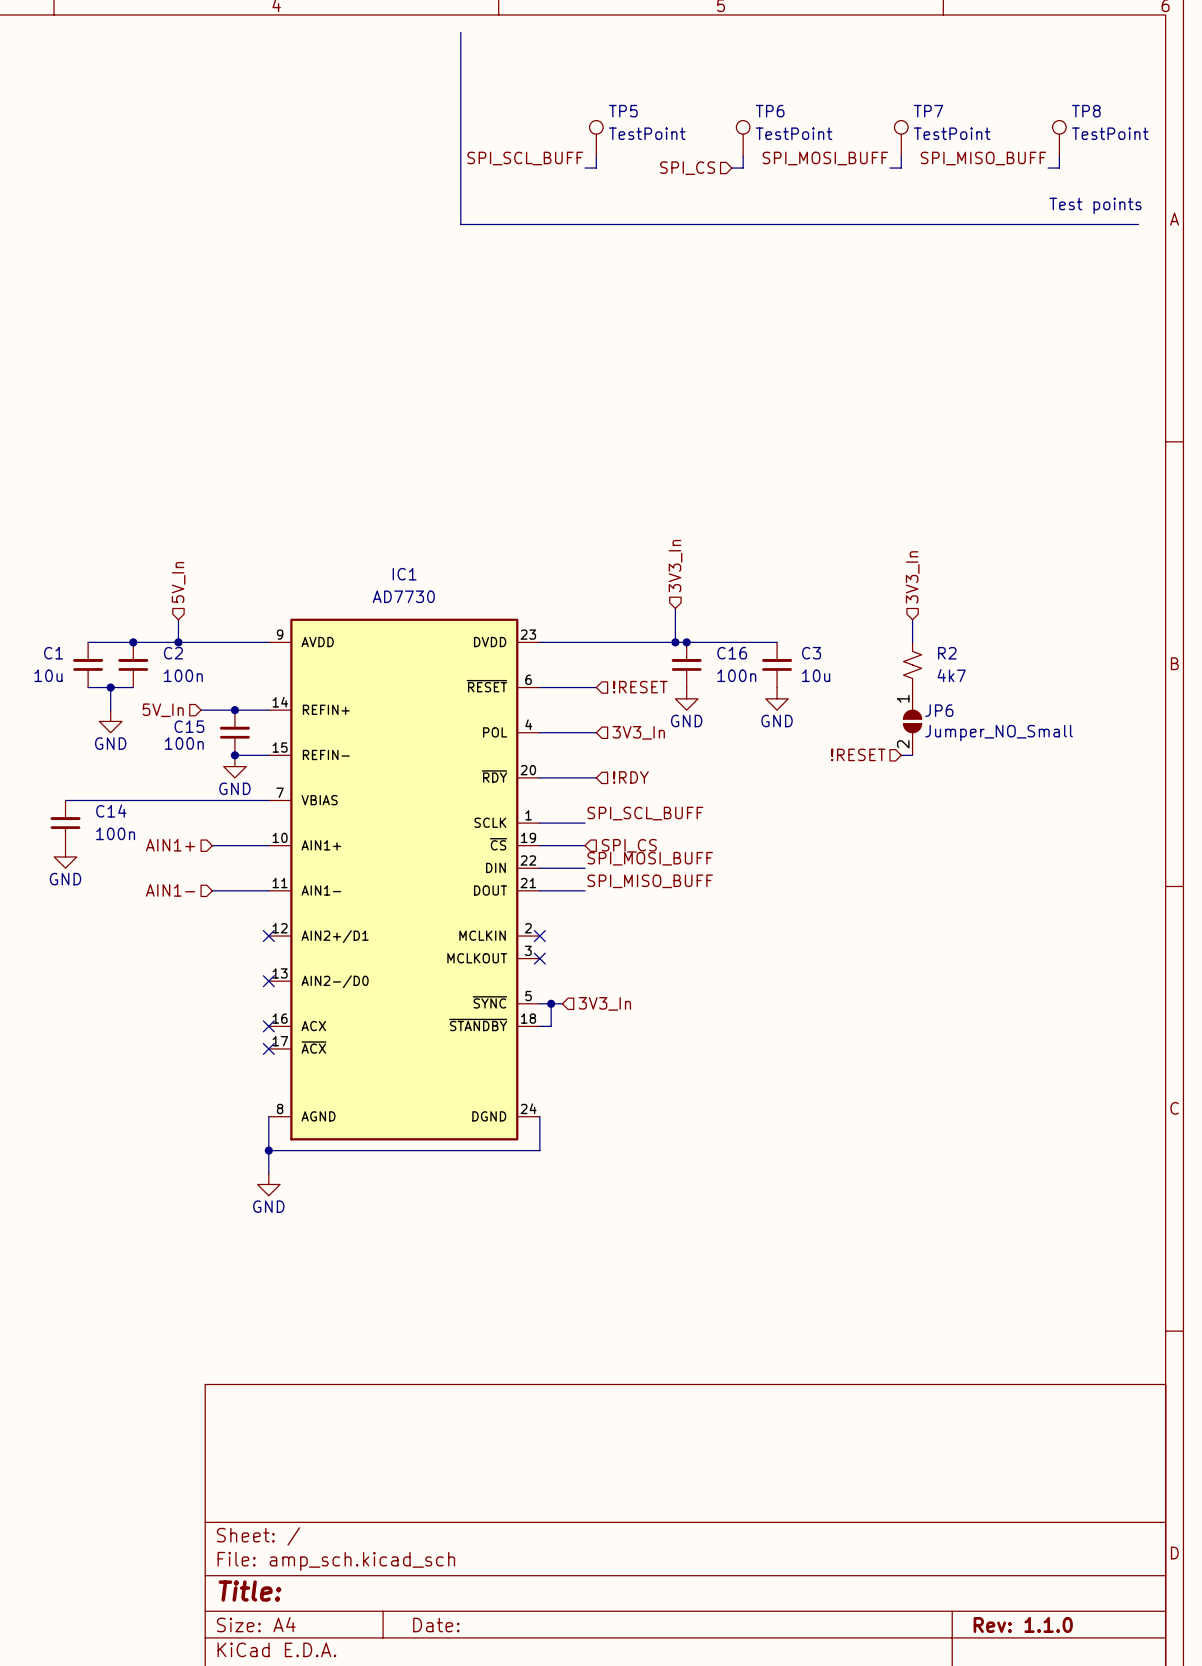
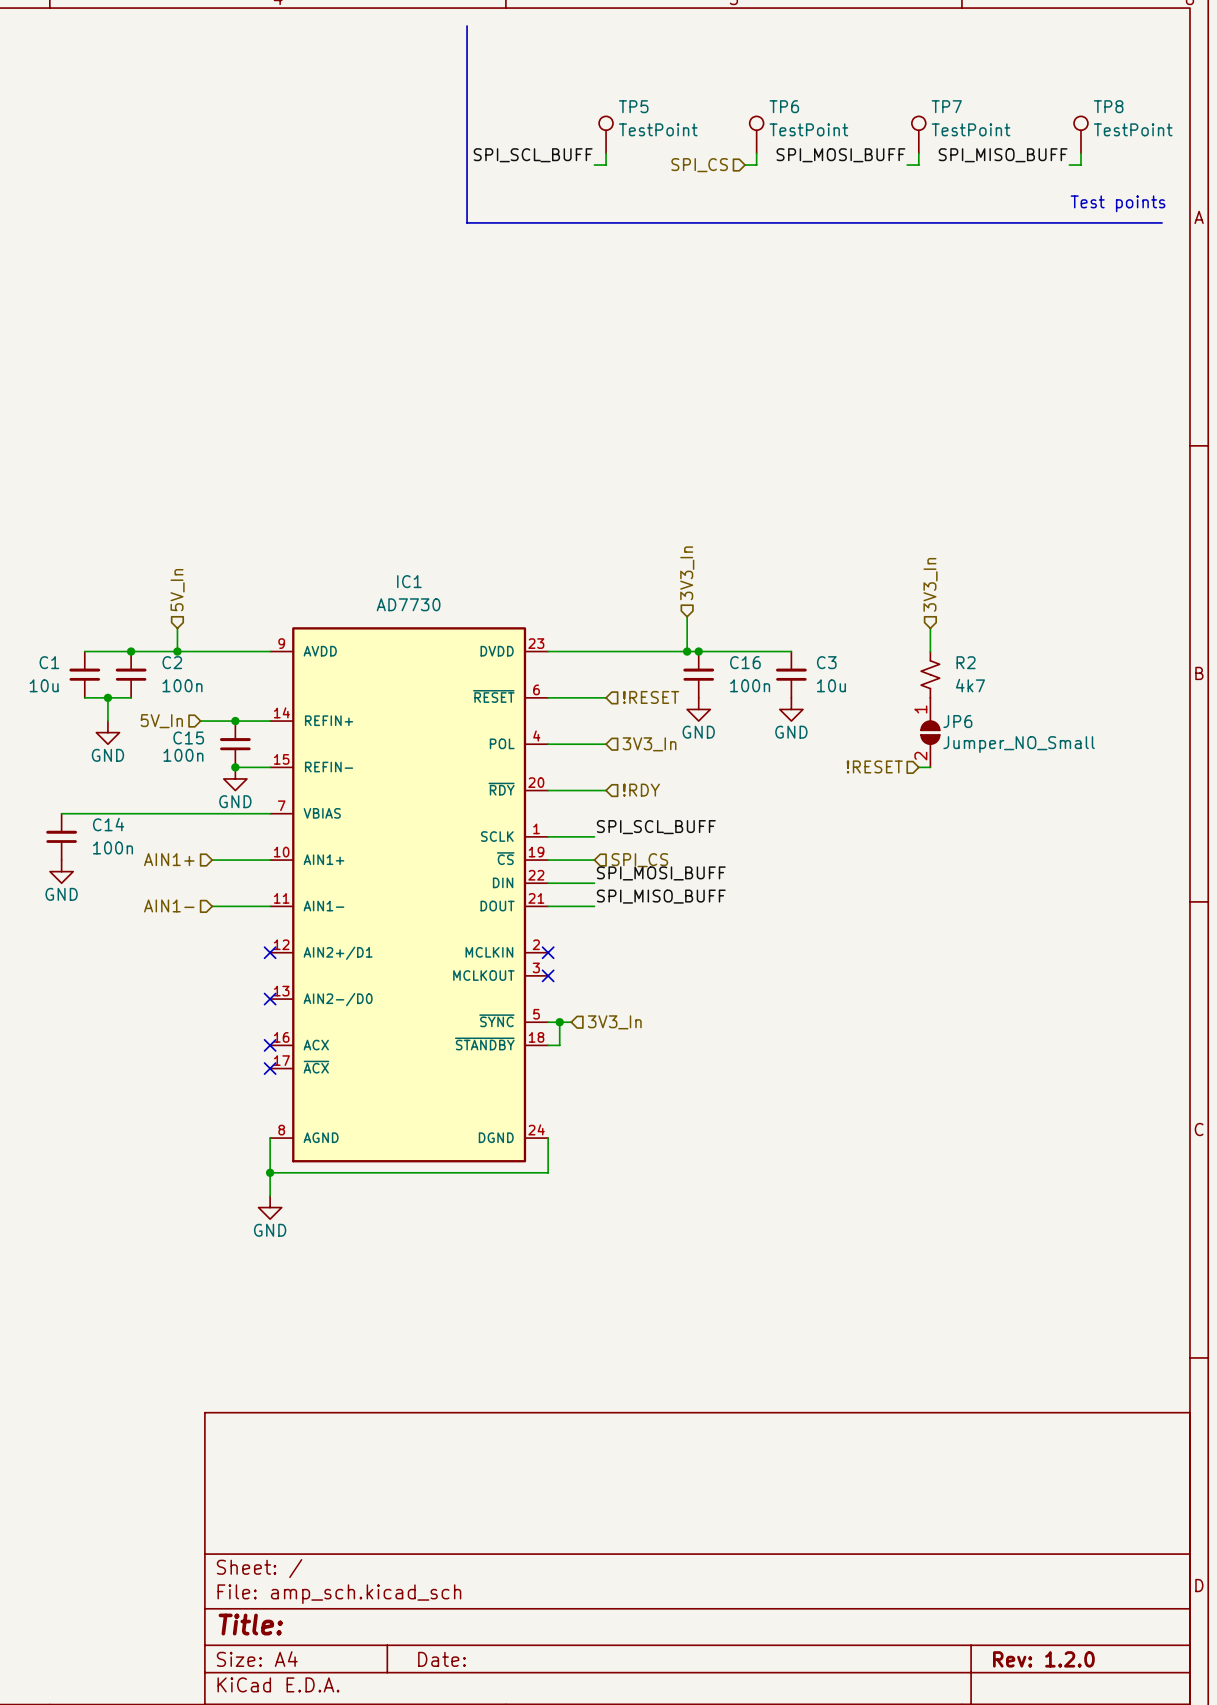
title block: Rev: 1.1.0 (1023, 1624) -> Rev: 1.2.0 (1043, 1659)

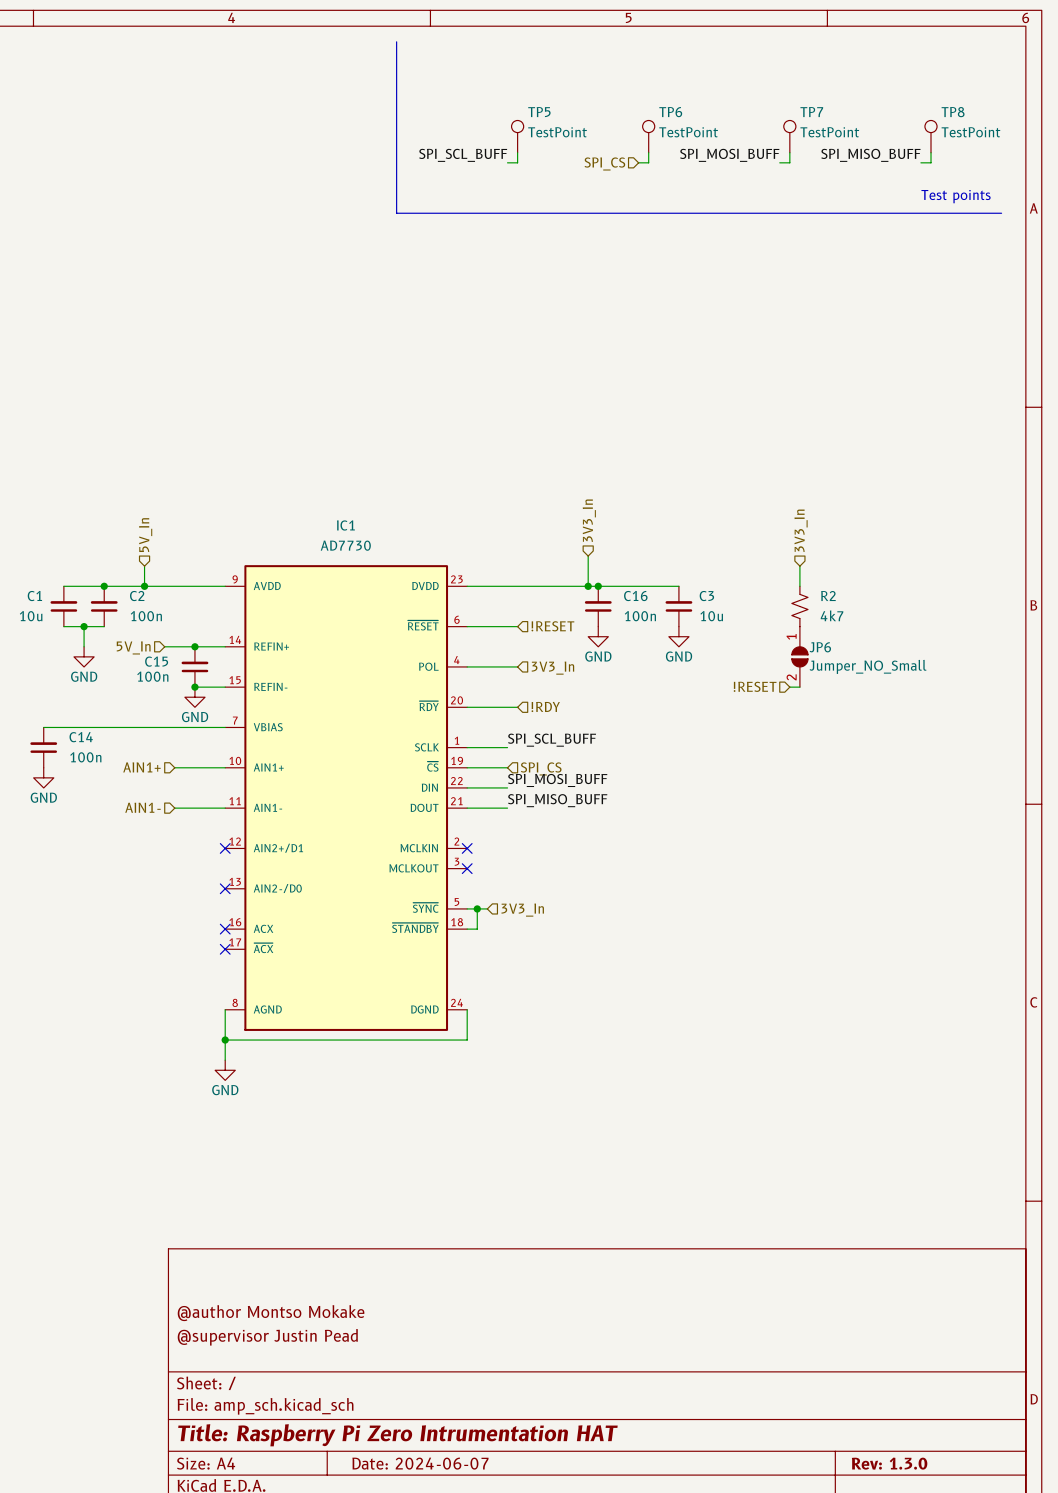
title block: none -> @author Montso Mokake (271, 1313)
title block: none -> @supervisor Justin Pead (267, 1337)
title block: Title: (250, 1624) -> Title: Raspberry Pi Zero Intrumentation HAT (397, 1435)
title block: Date: (441, 1659) -> Date: 2024-06-07 (420, 1463)
title block: Rev: 1.2.0 (1043, 1659) -> Rev: 1.3.0 (889, 1463)

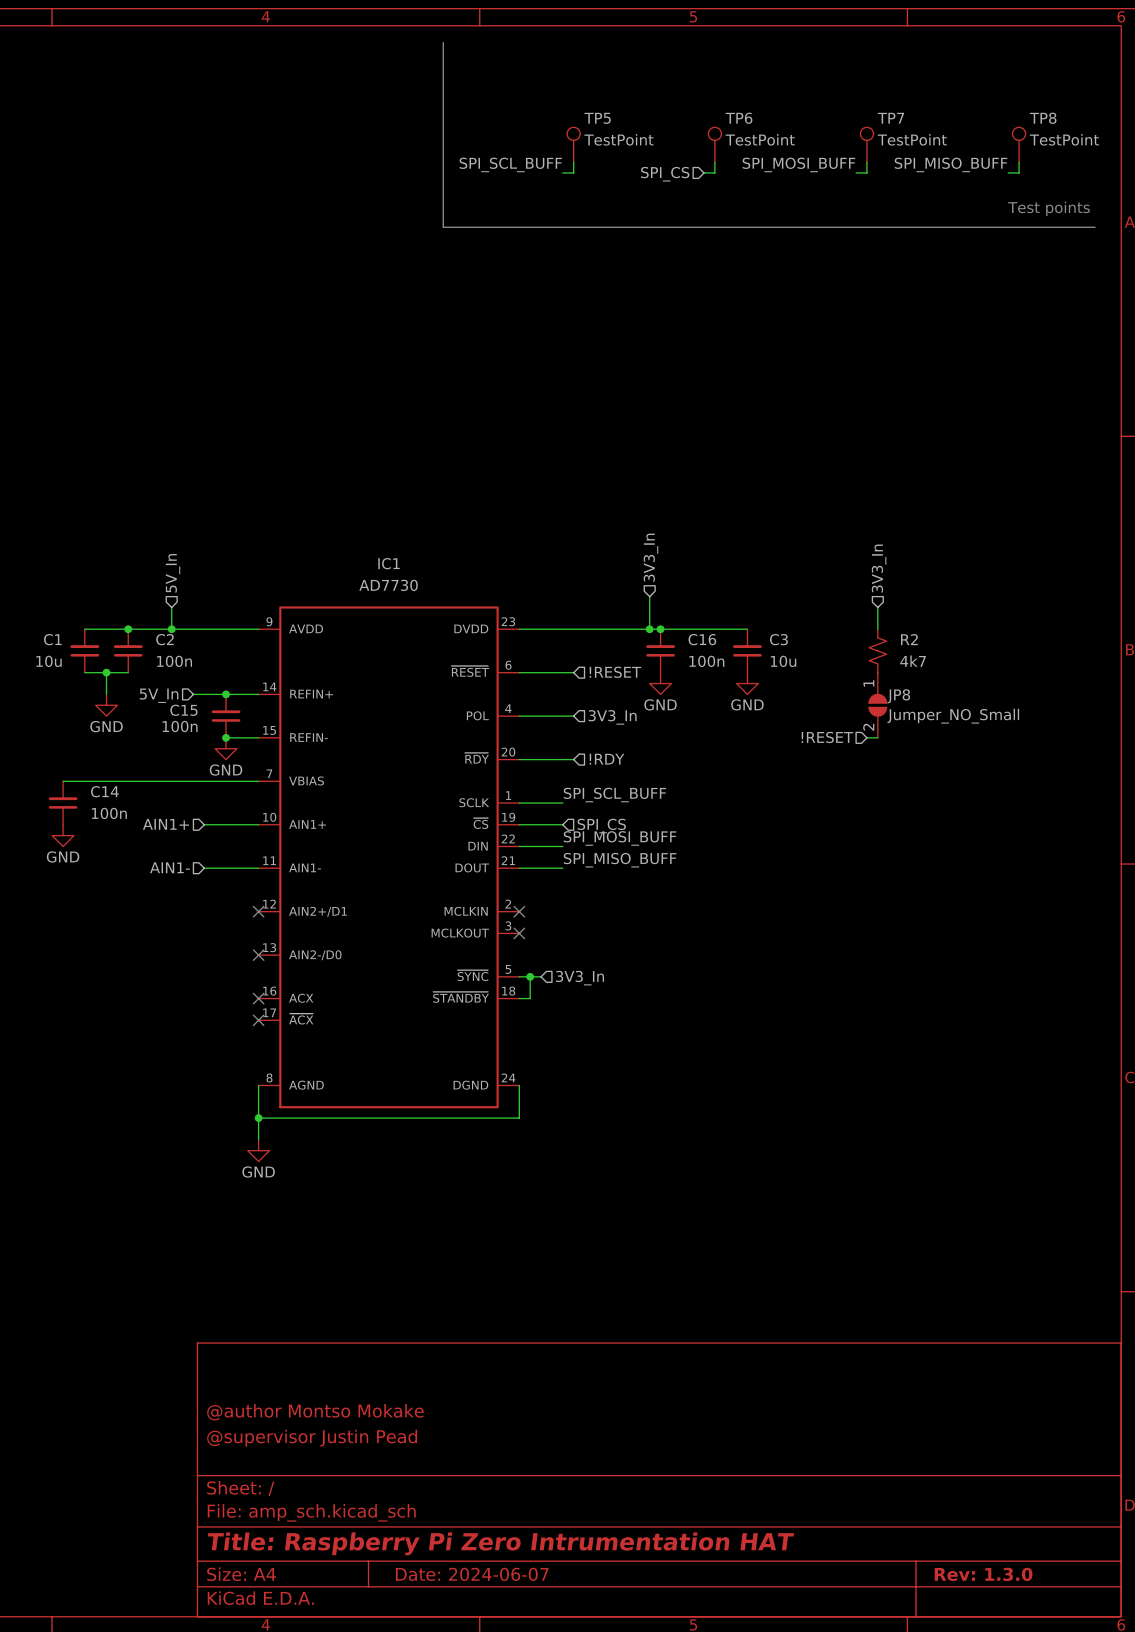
JP6 name: JP6 (820, 647) -> JP8 (898, 696)

